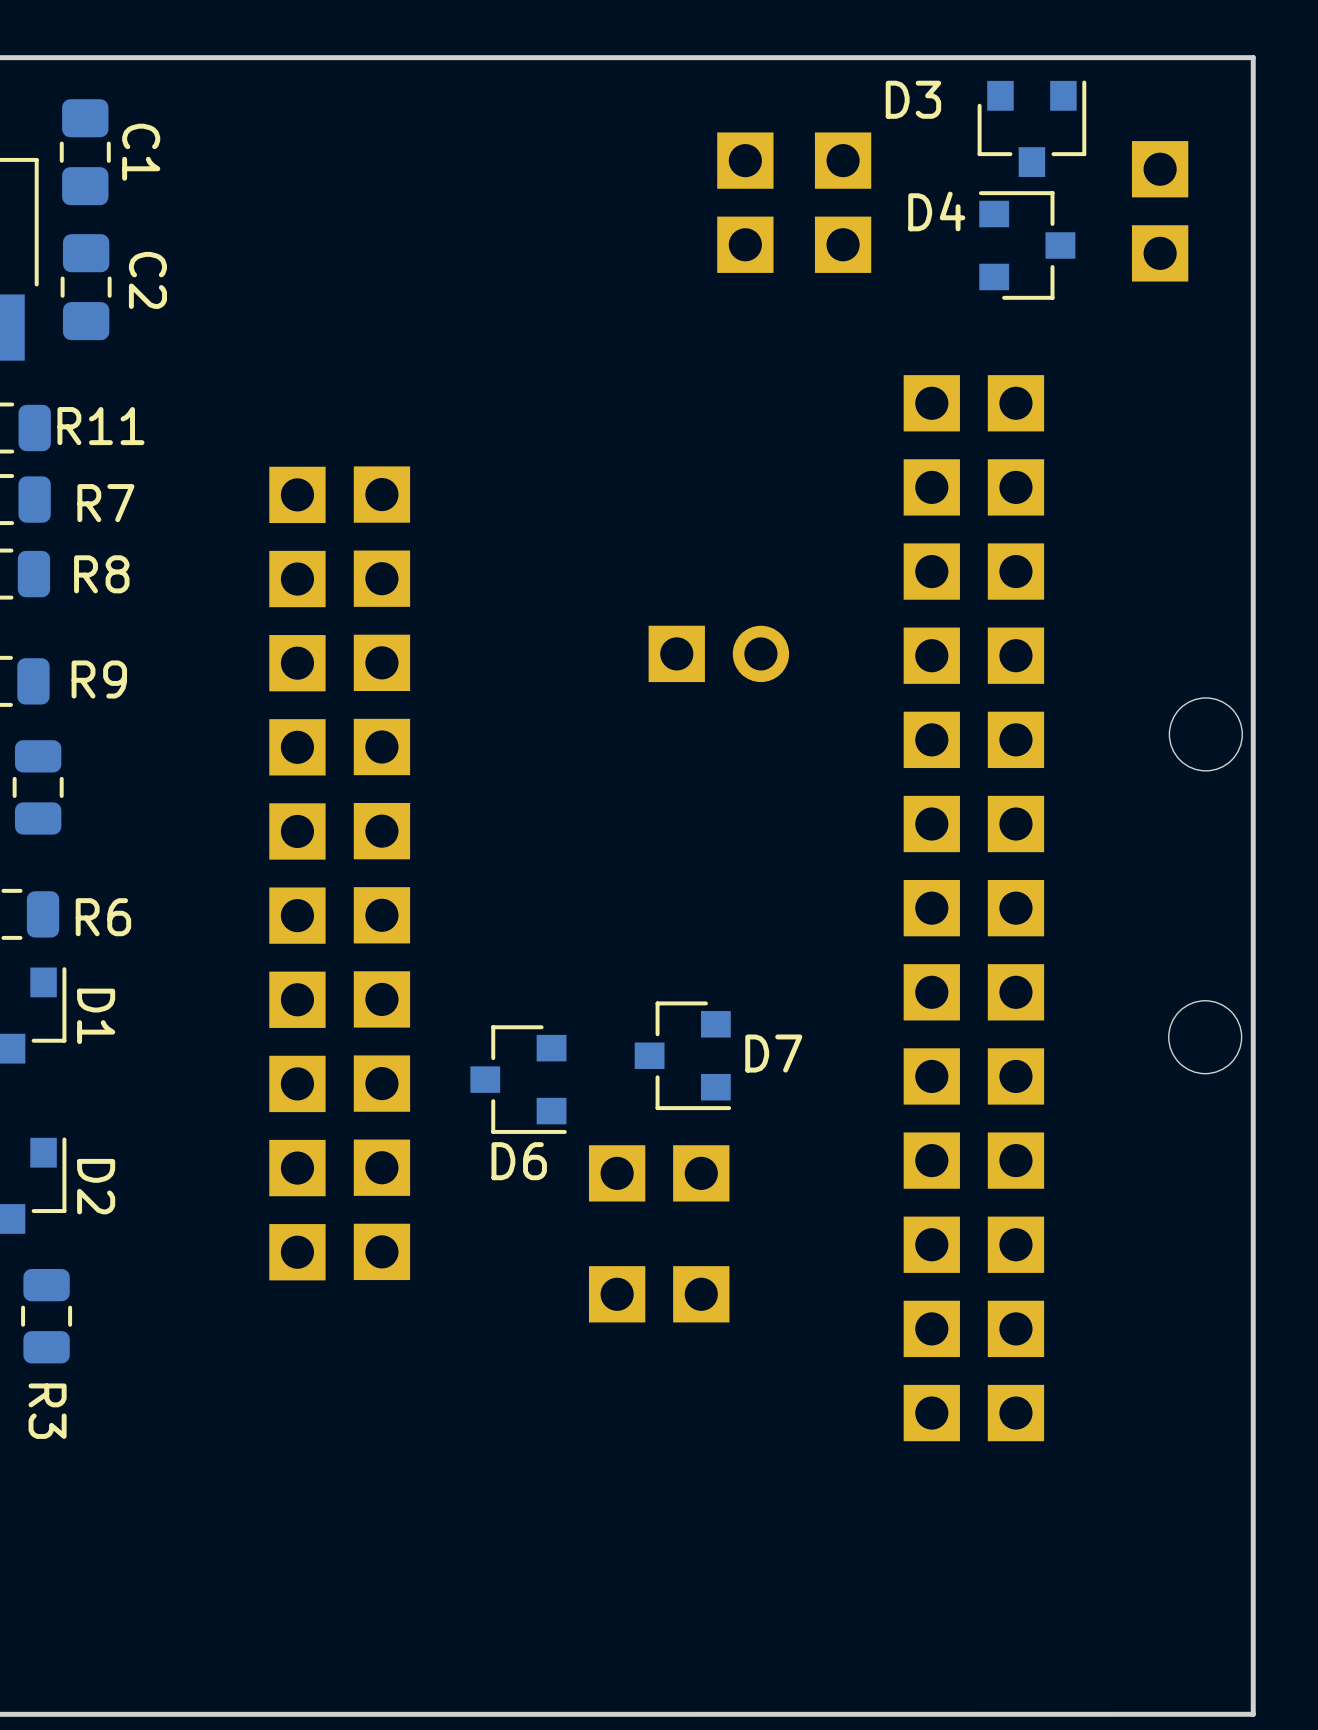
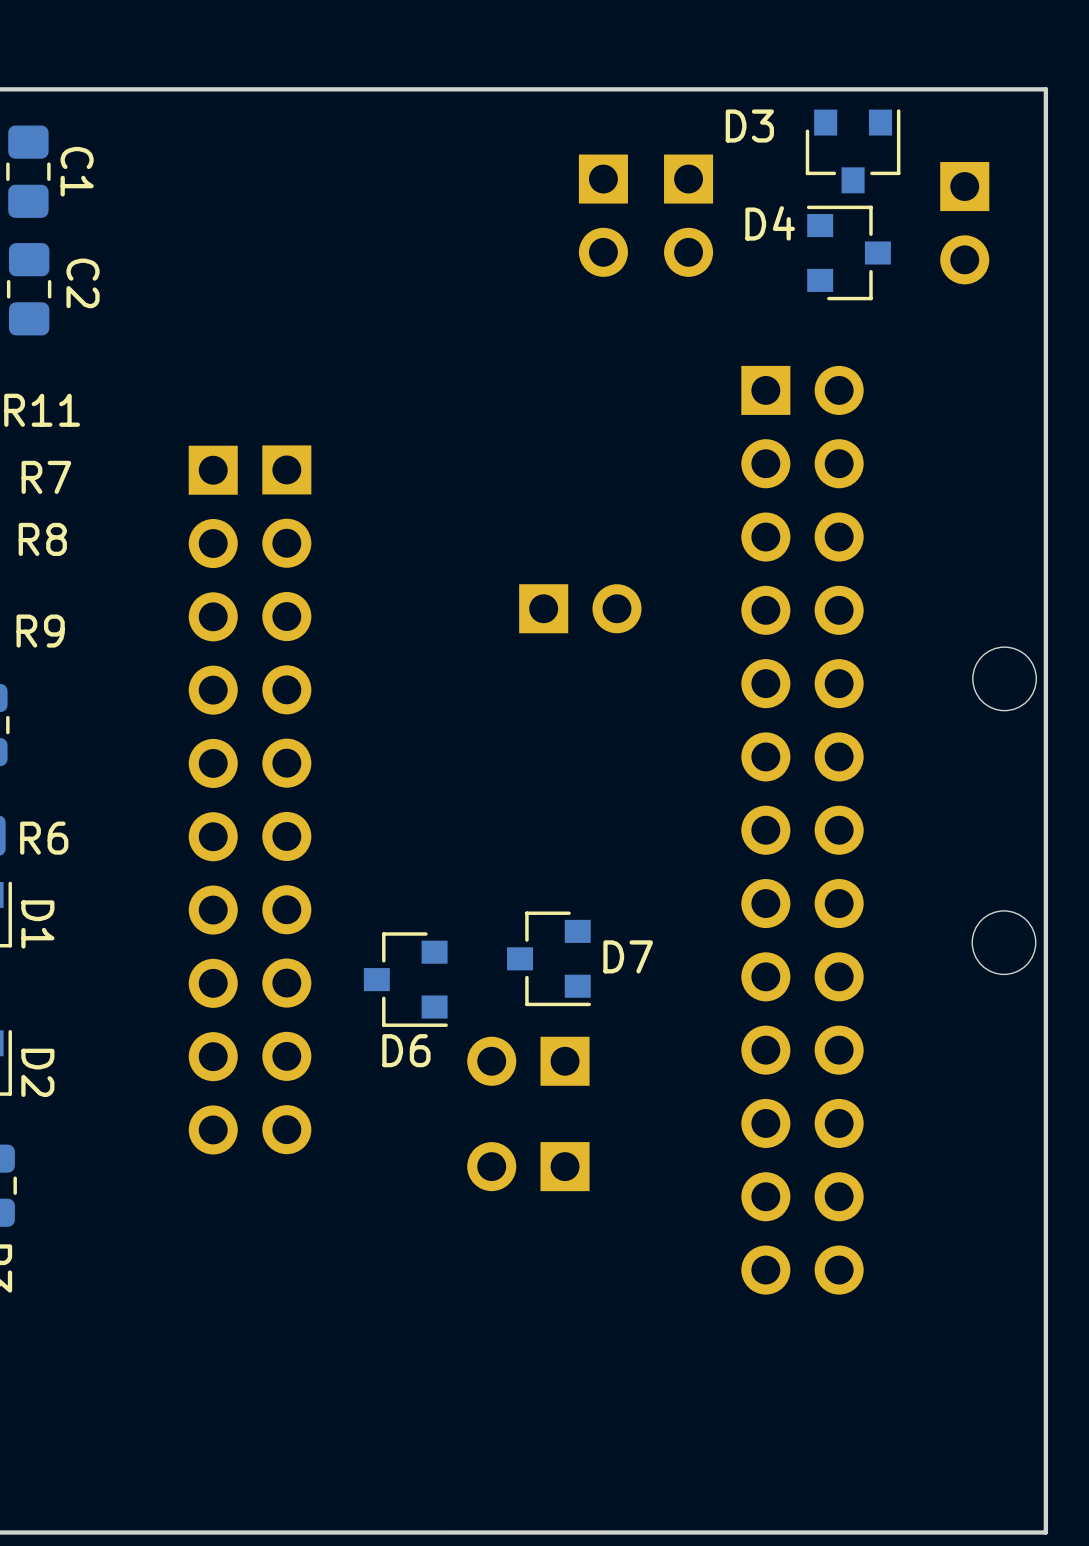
part footprint: [717, 132, 774, 273] -> [578, 154, 628, 277]
part footprint: [814, 132, 872, 273] -> [664, 154, 714, 277]
part footprint: [1131, 141, 1189, 282] -> [940, 162, 990, 285]
part footprint: [903, 375, 1045, 1442] -> [741, 365, 864, 1295]
part footprint: [269, 466, 326, 1281] -> [188, 445, 238, 1155]
part footprint: [353, 466, 411, 1281] -> [262, 445, 312, 1155]
part footprint: [588, 1145, 730, 1202] -> [467, 1036, 590, 1086]
part footprint: [588, 1266, 730, 1323] -> [467, 1142, 590, 1192]

